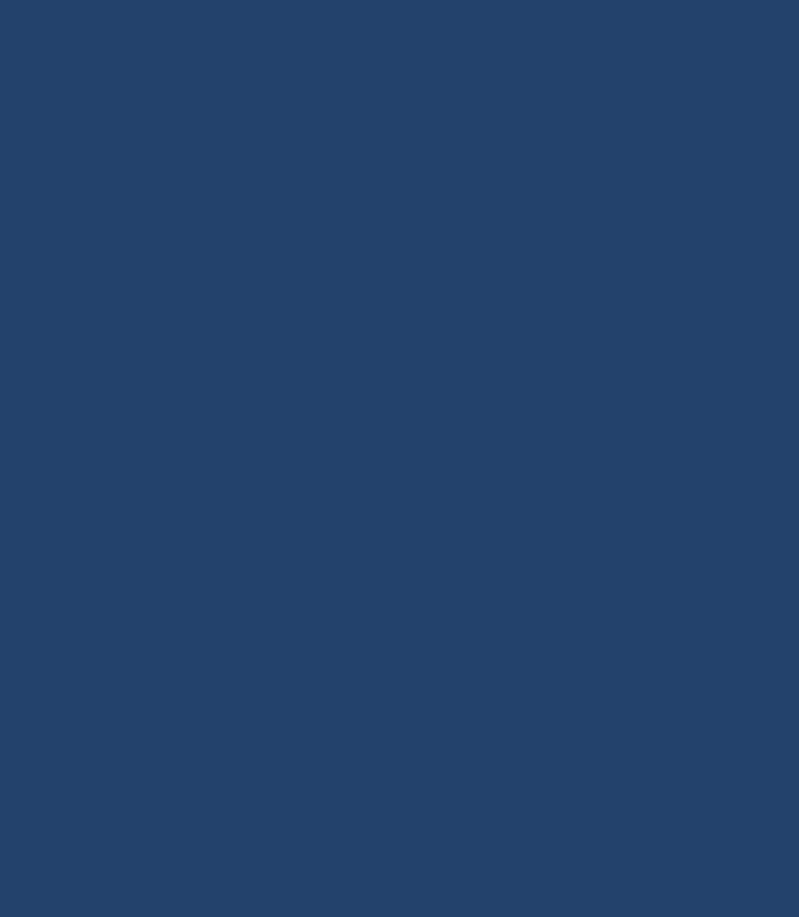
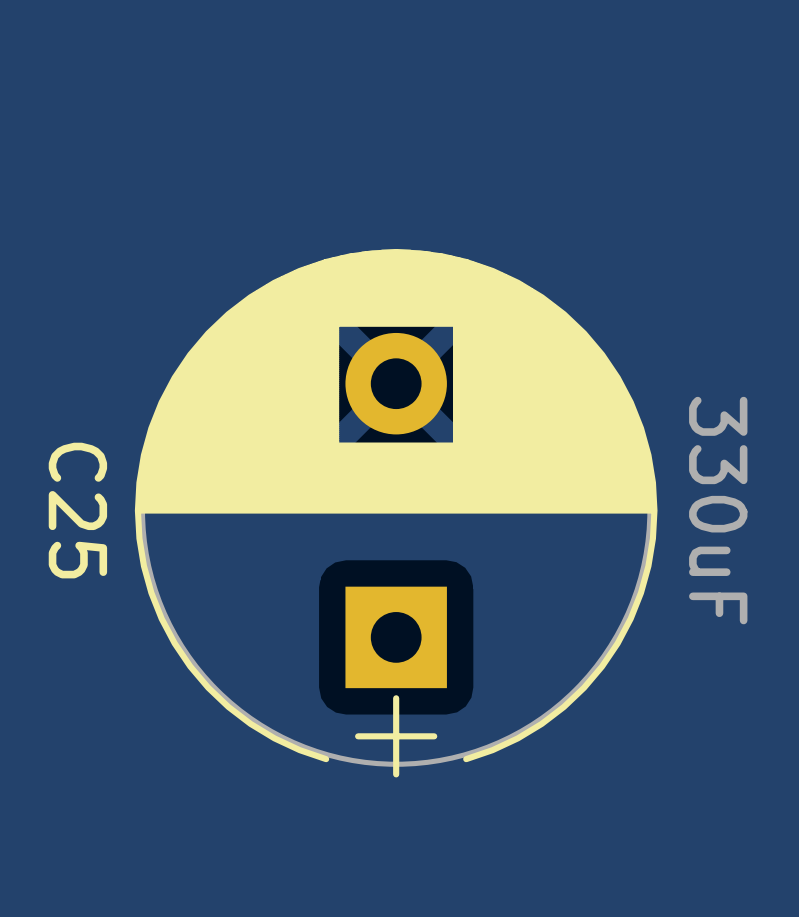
C25: none -> 330uF (396, 513)

